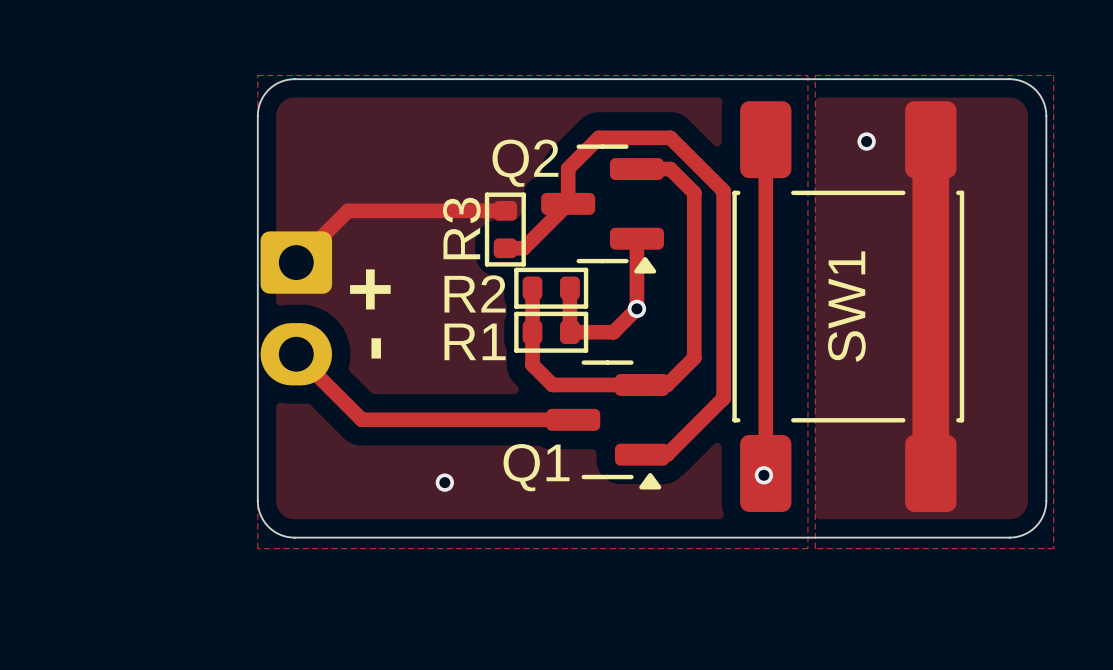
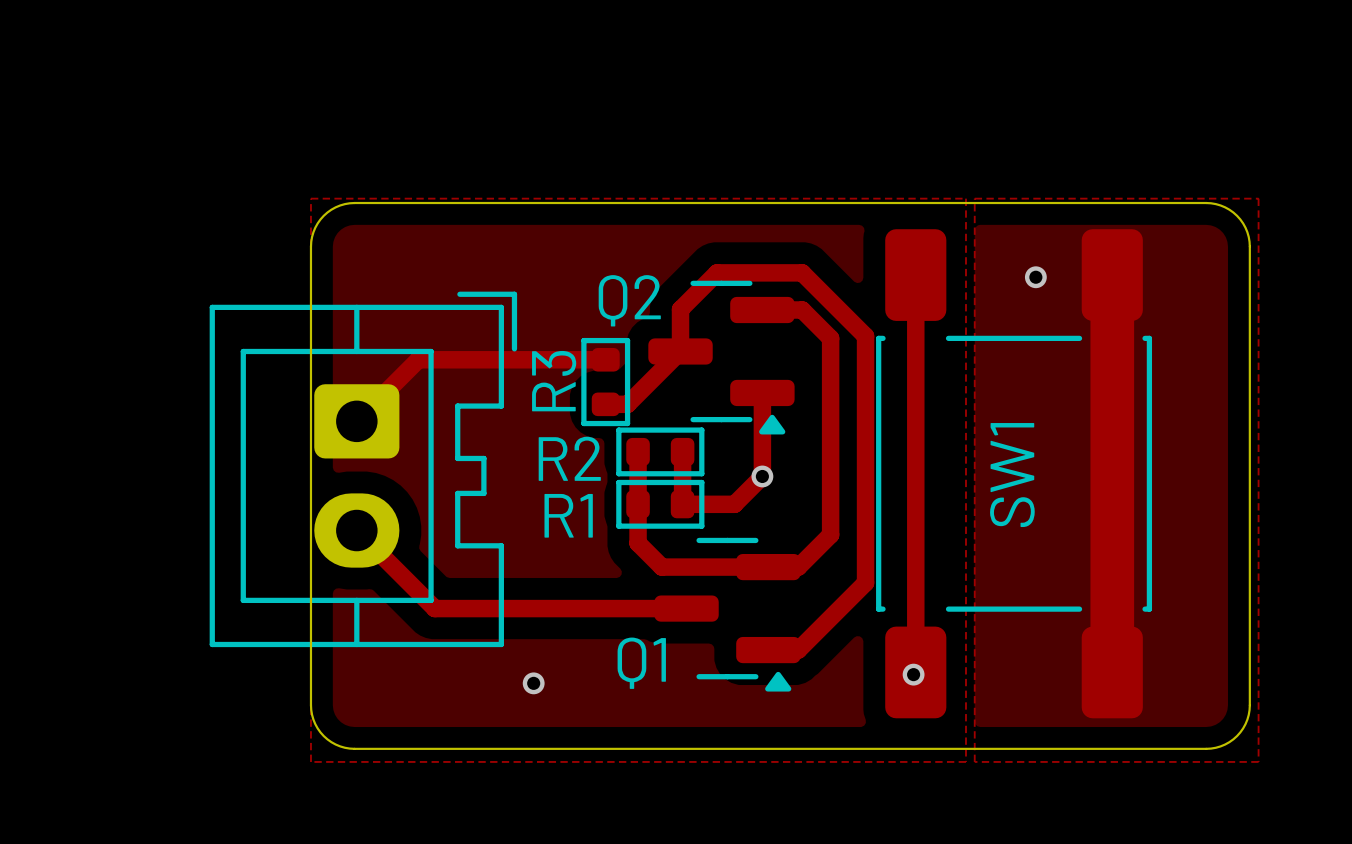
part footprint: [260, 231, 333, 386] -> [209, 291, 518, 648]
text: - + (370, 313) -> none

